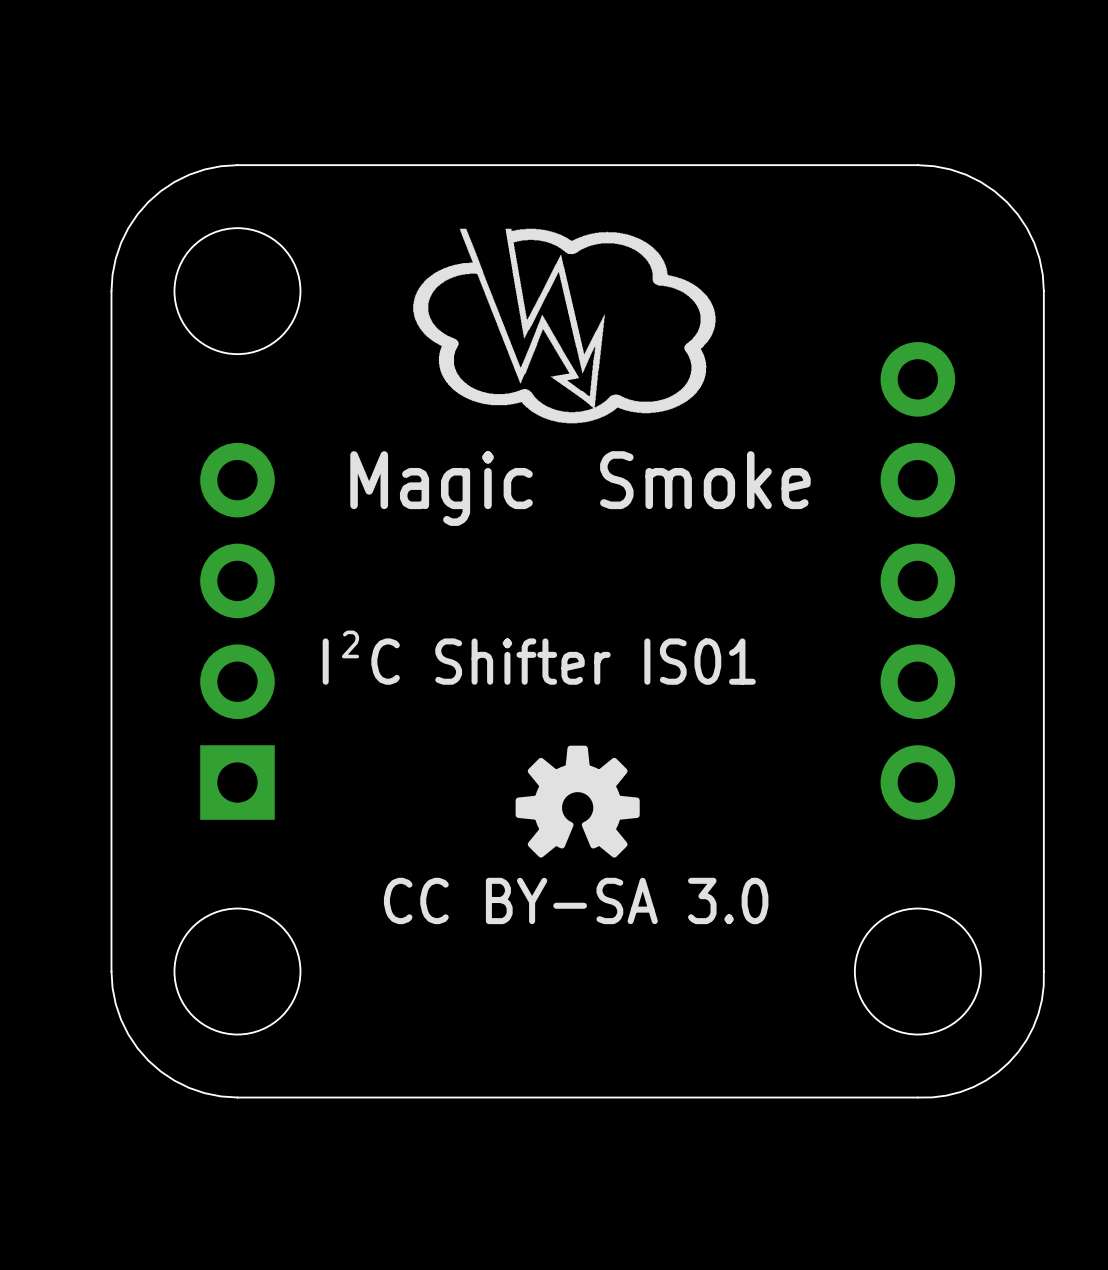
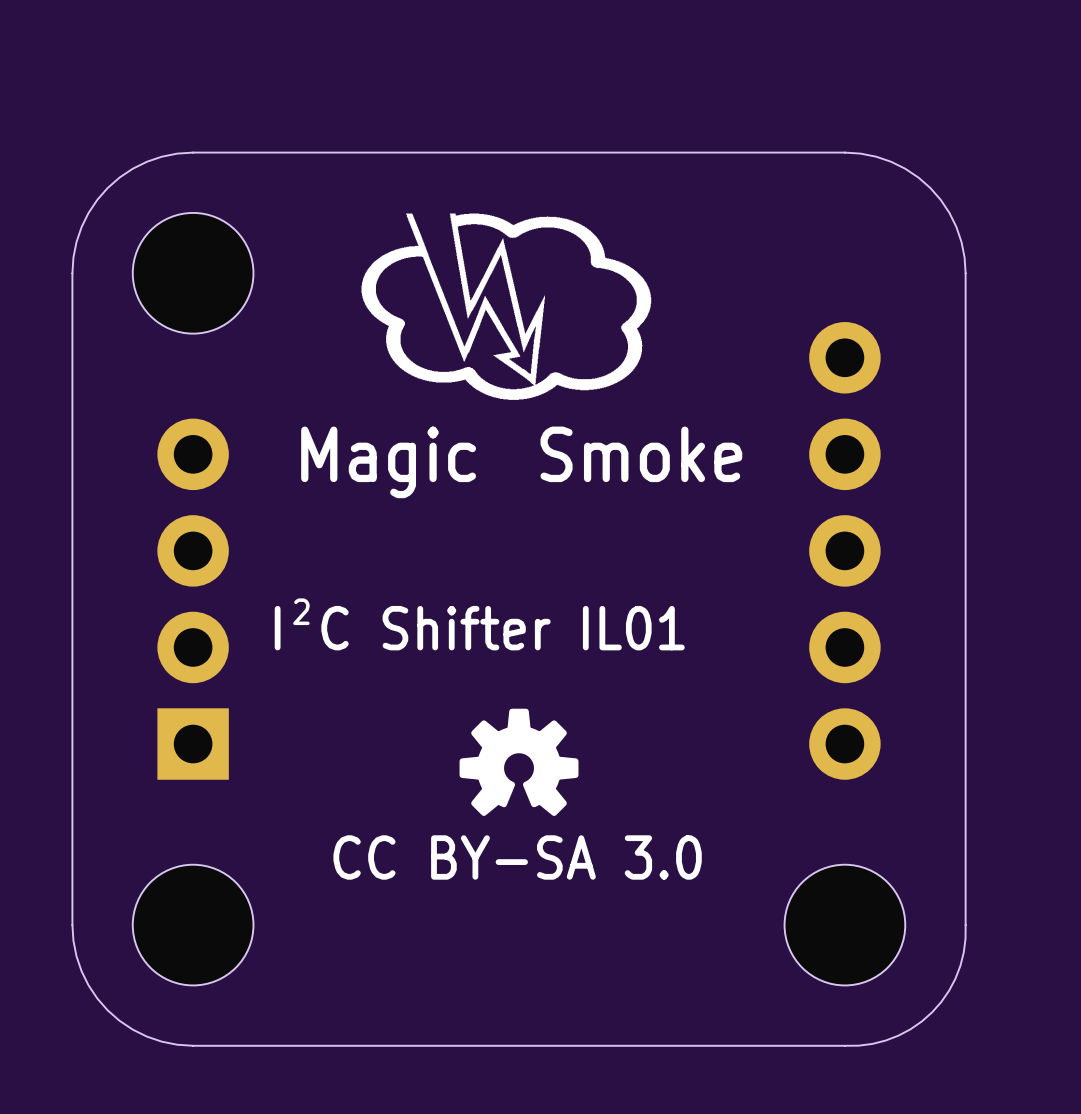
text: C Shifter IS01 (563, 661) -> C Shifter IL01 (503, 628)

